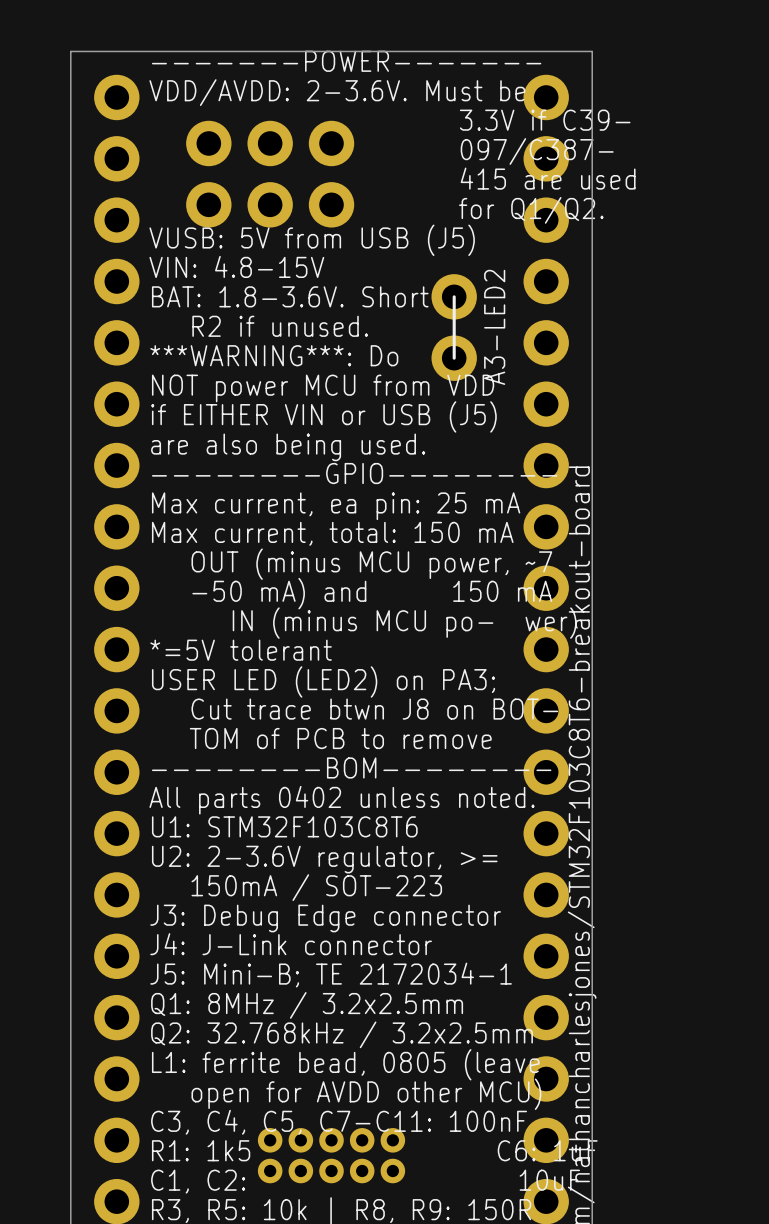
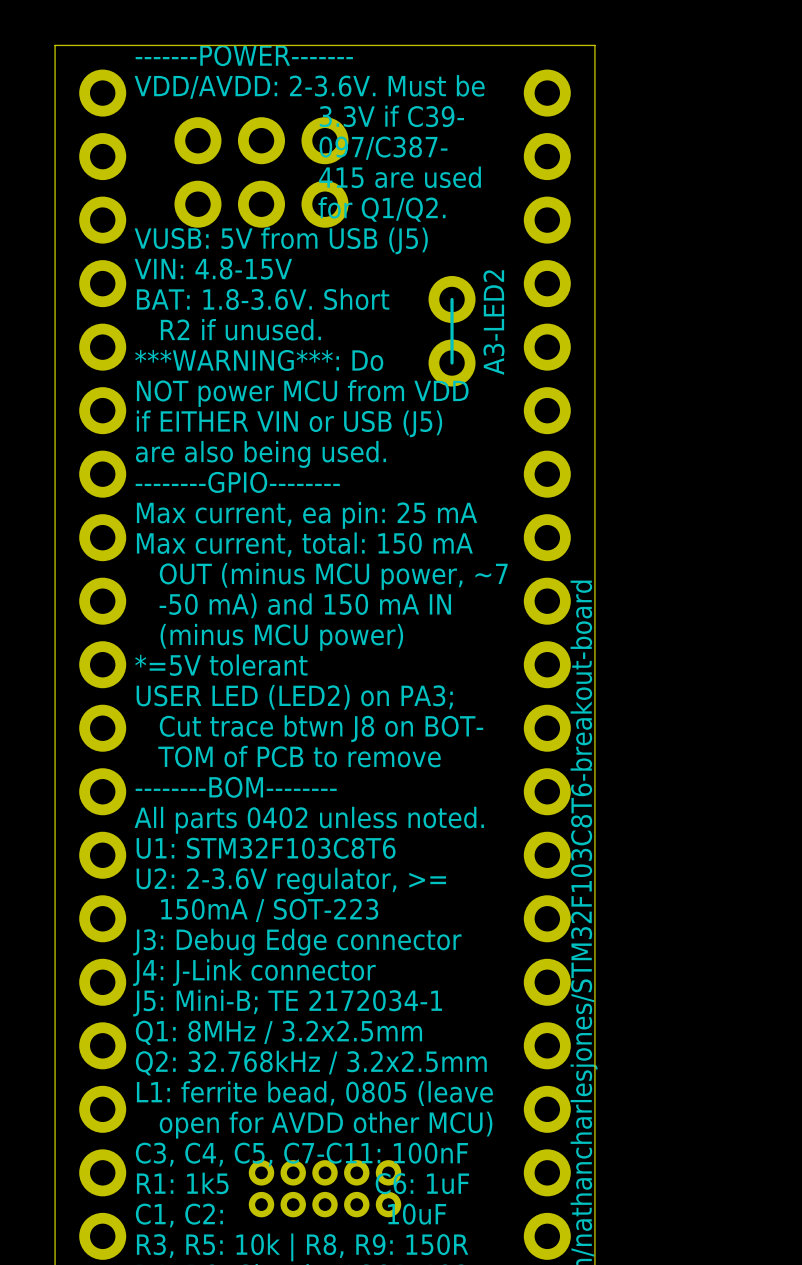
text: -50 mA) and 150 mA (372, 593) -> -50 mA) and 150 mA IN (305, 605)
text: IN (minus MCU po- wer) (404, 623) -> (minus MCU power) (281, 637)

